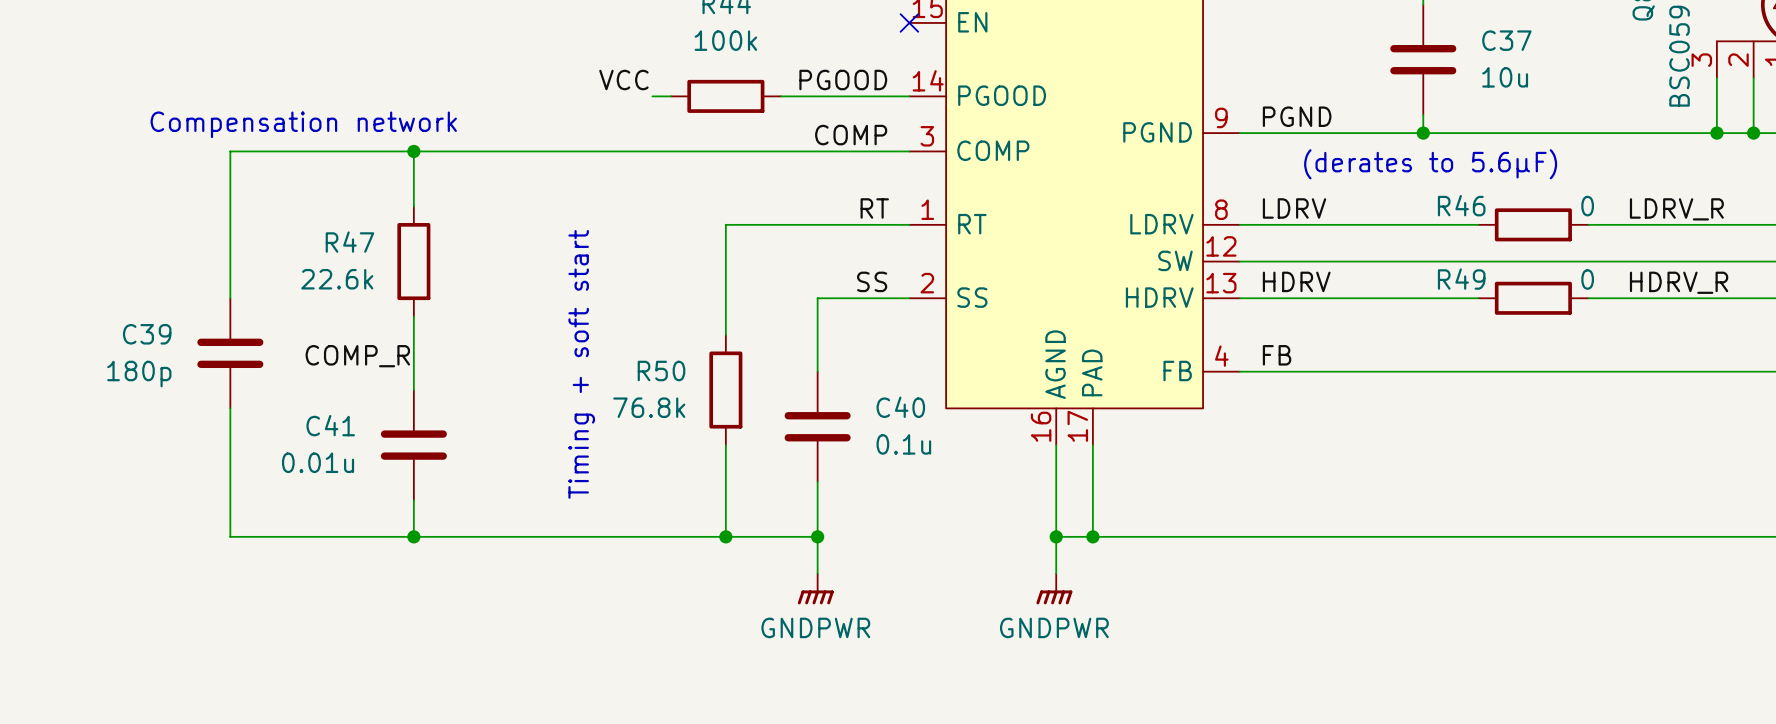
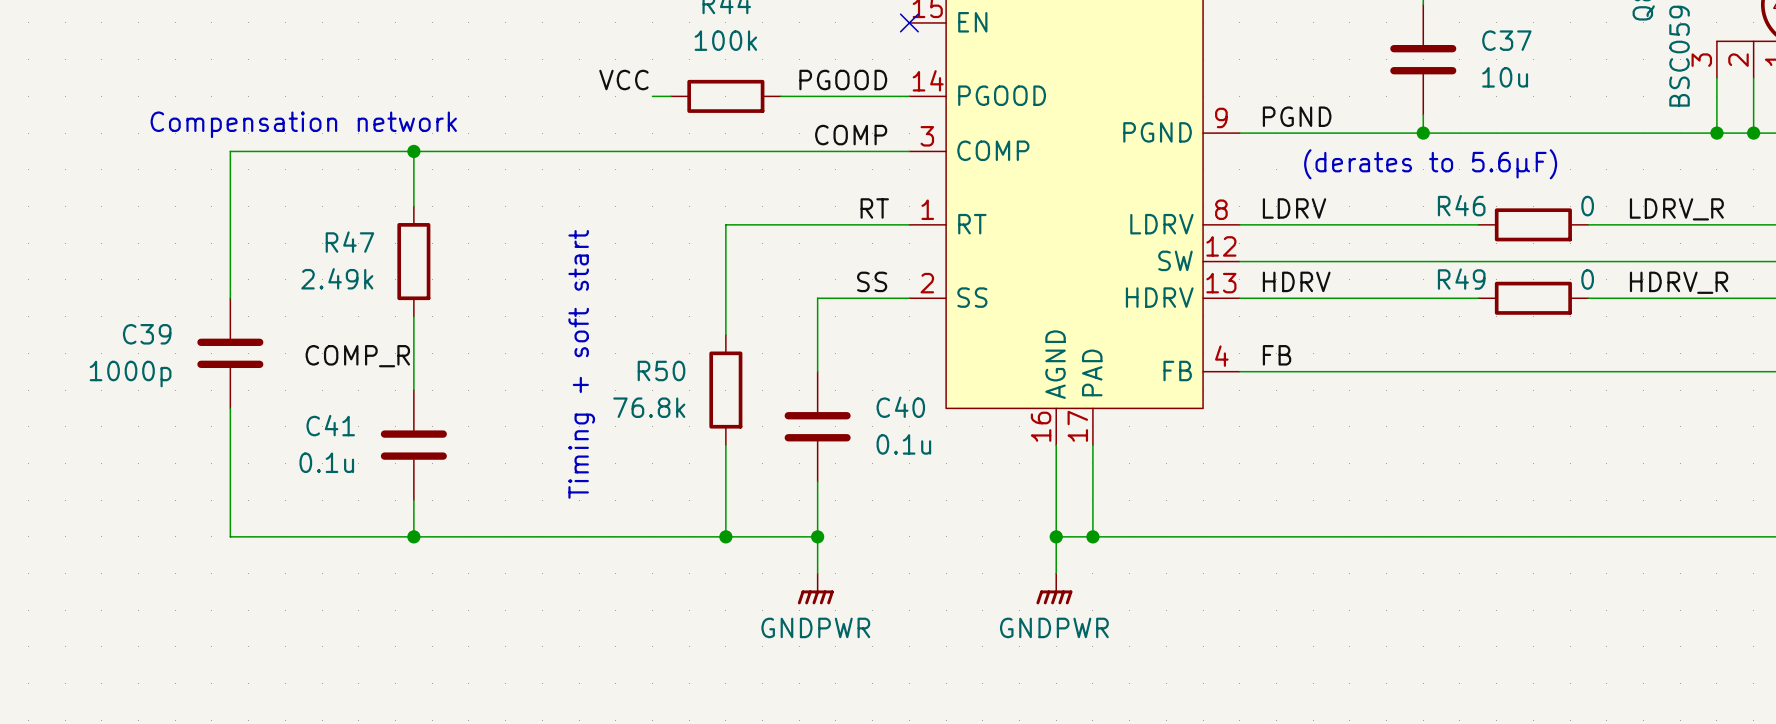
R47 value: 22.6k (337, 279) -> 2.49k (337, 278)
C39 value: 180p (139, 374) -> 1000p (130, 374)
C41 value: 0.01u (318, 462) -> 0.1u (326, 462)

